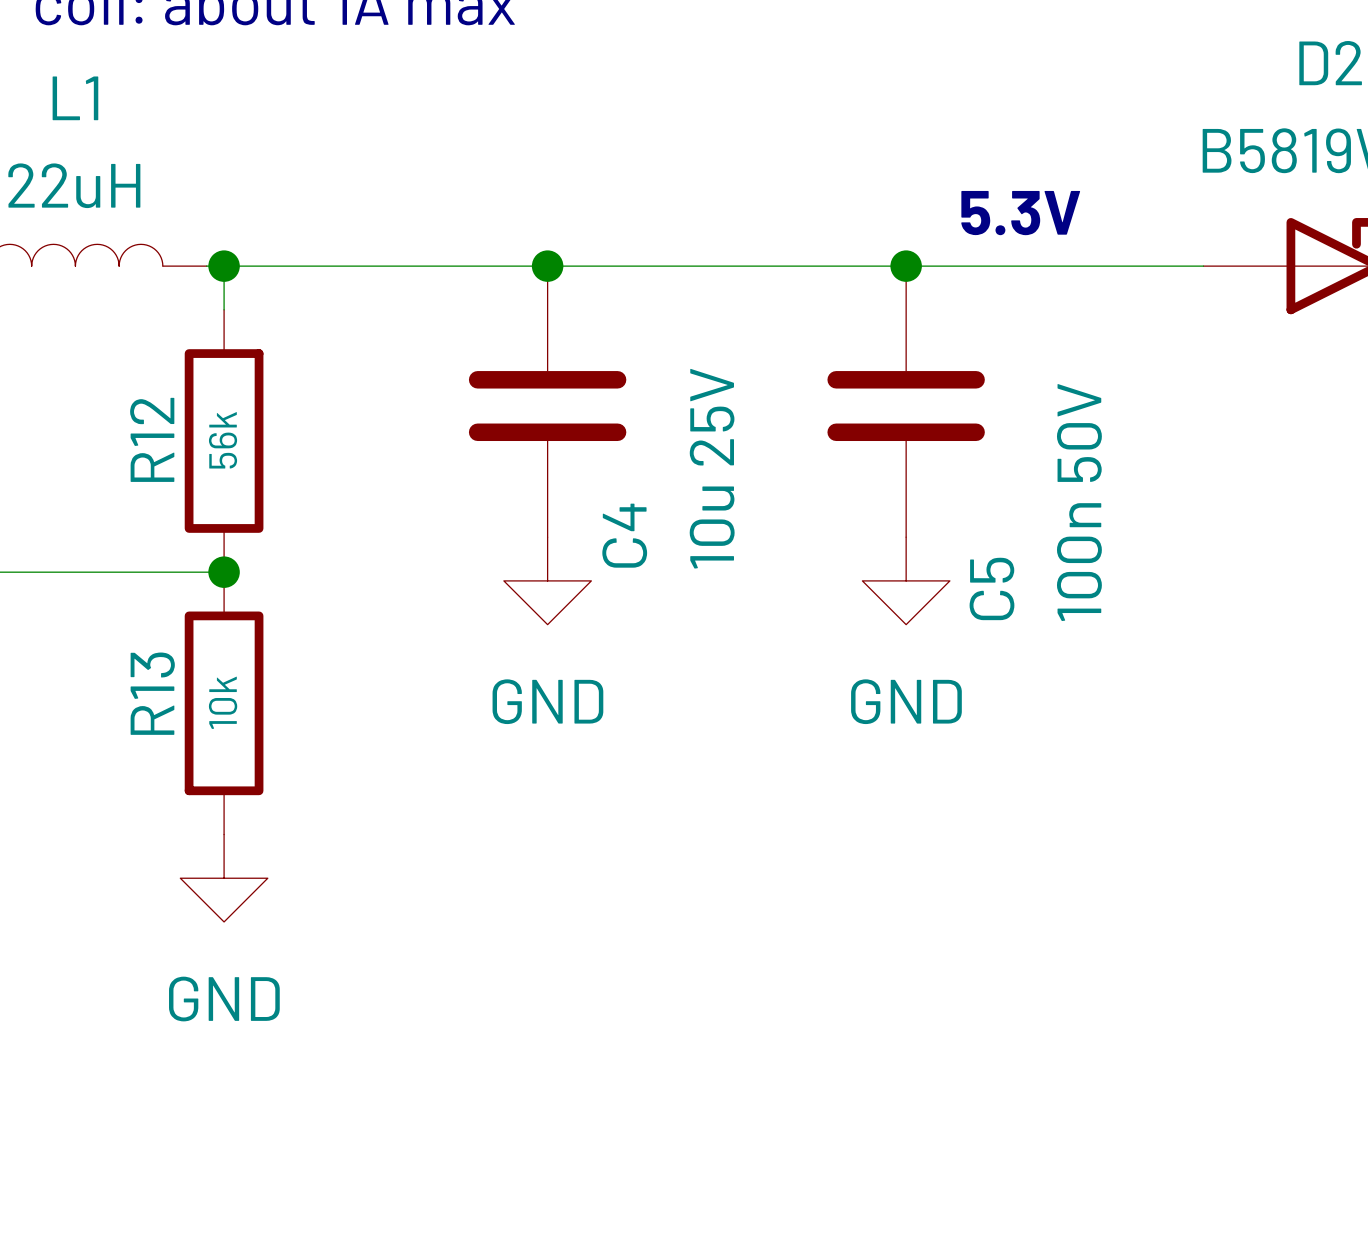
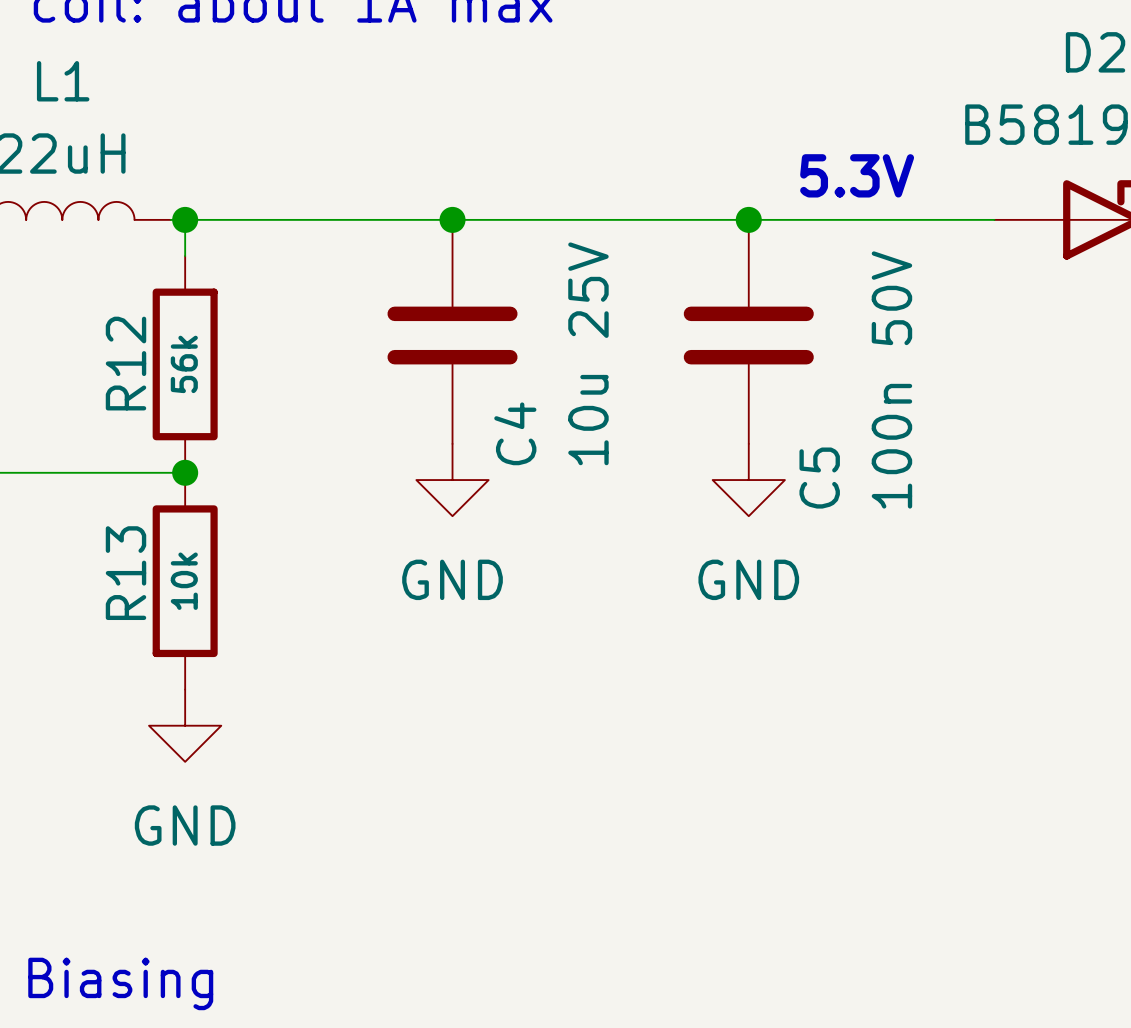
text: none -> Biasing (120, 983)

